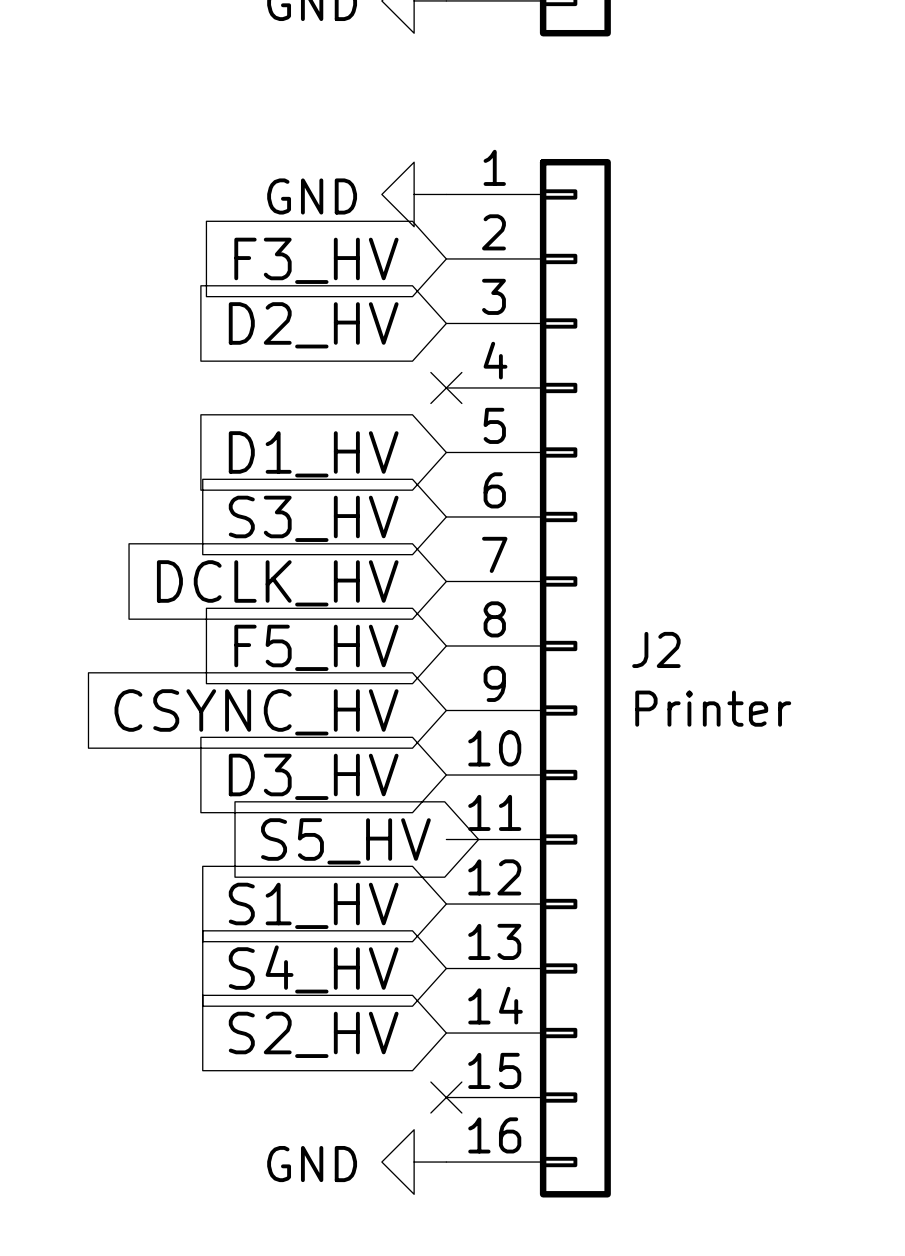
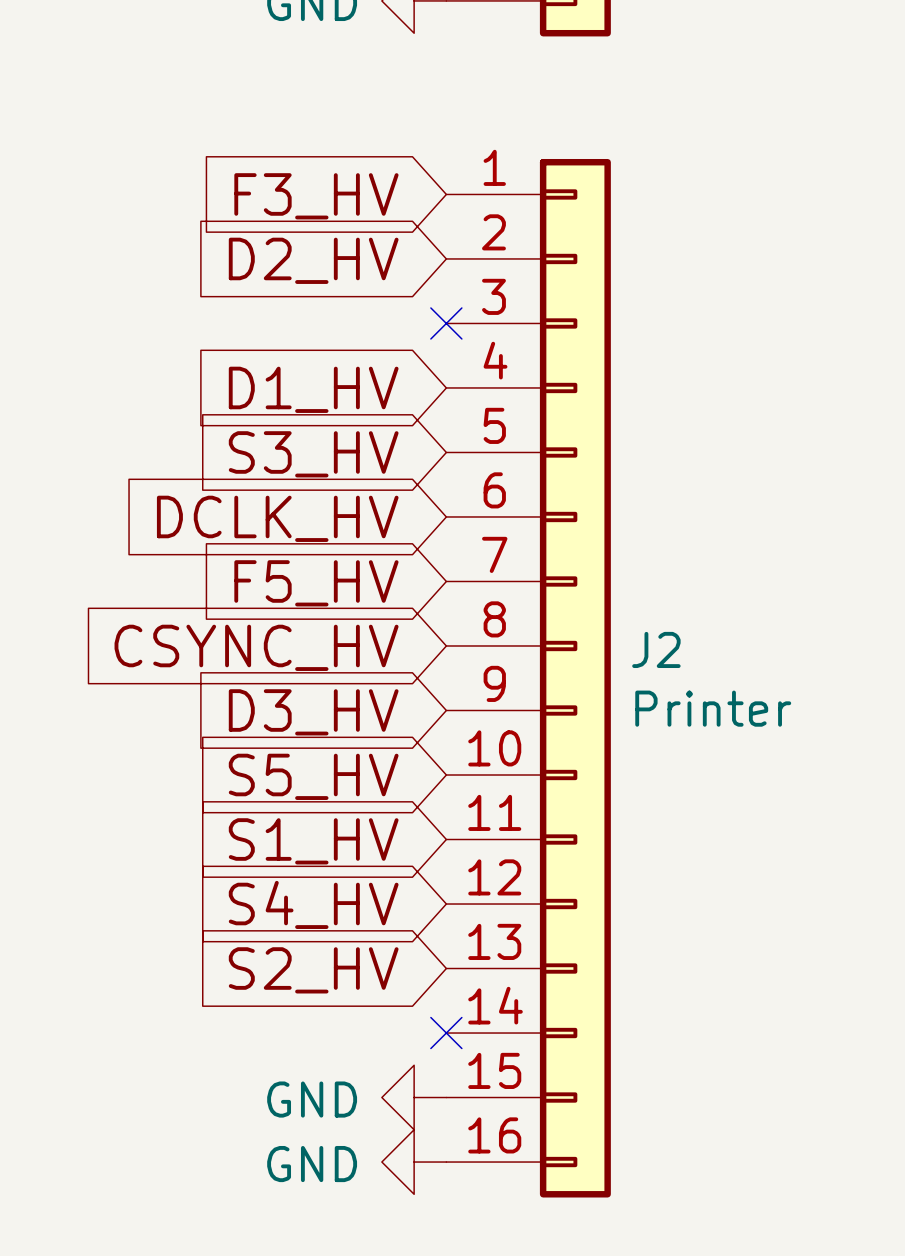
power symbol: GND (414, 194) -> none
global label: none -> F3_HV (316, 196)
global label: F3_HV (316, 260) -> D2_HV (313, 260)
global label: D2_HV (313, 325) -> D1_HV (313, 389)
no-connect mark position: (446, 387) -> (446, 323)
global label: D1_HV (313, 454) -> S3_HV (313, 454)
global label: S3_HV (313, 518) -> DCLK_HV (277, 518)
global label: DCLK_HV (277, 583) -> F5_HV (316, 583)
global label: F5_HV (316, 647) -> CSYNC_HV (256, 647)
global label: CSYNC_HV (256, 712) -> D3_HV (313, 712)
global label: D3_HV (313, 776) -> S5_HV (313, 776)
global label: S5_HV (345, 841) -> S1_HV (313, 841)
global label: S1_HV (313, 905) -> S4_HV (313, 904)
global label: S4_HV (313, 969) -> S2_HV (313, 970)
global label: S2_HV (313, 1034) -> none
power symbol: none -> GND (414, 1097)
no-connect mark position: (446, 1097) -> (446, 1033)

